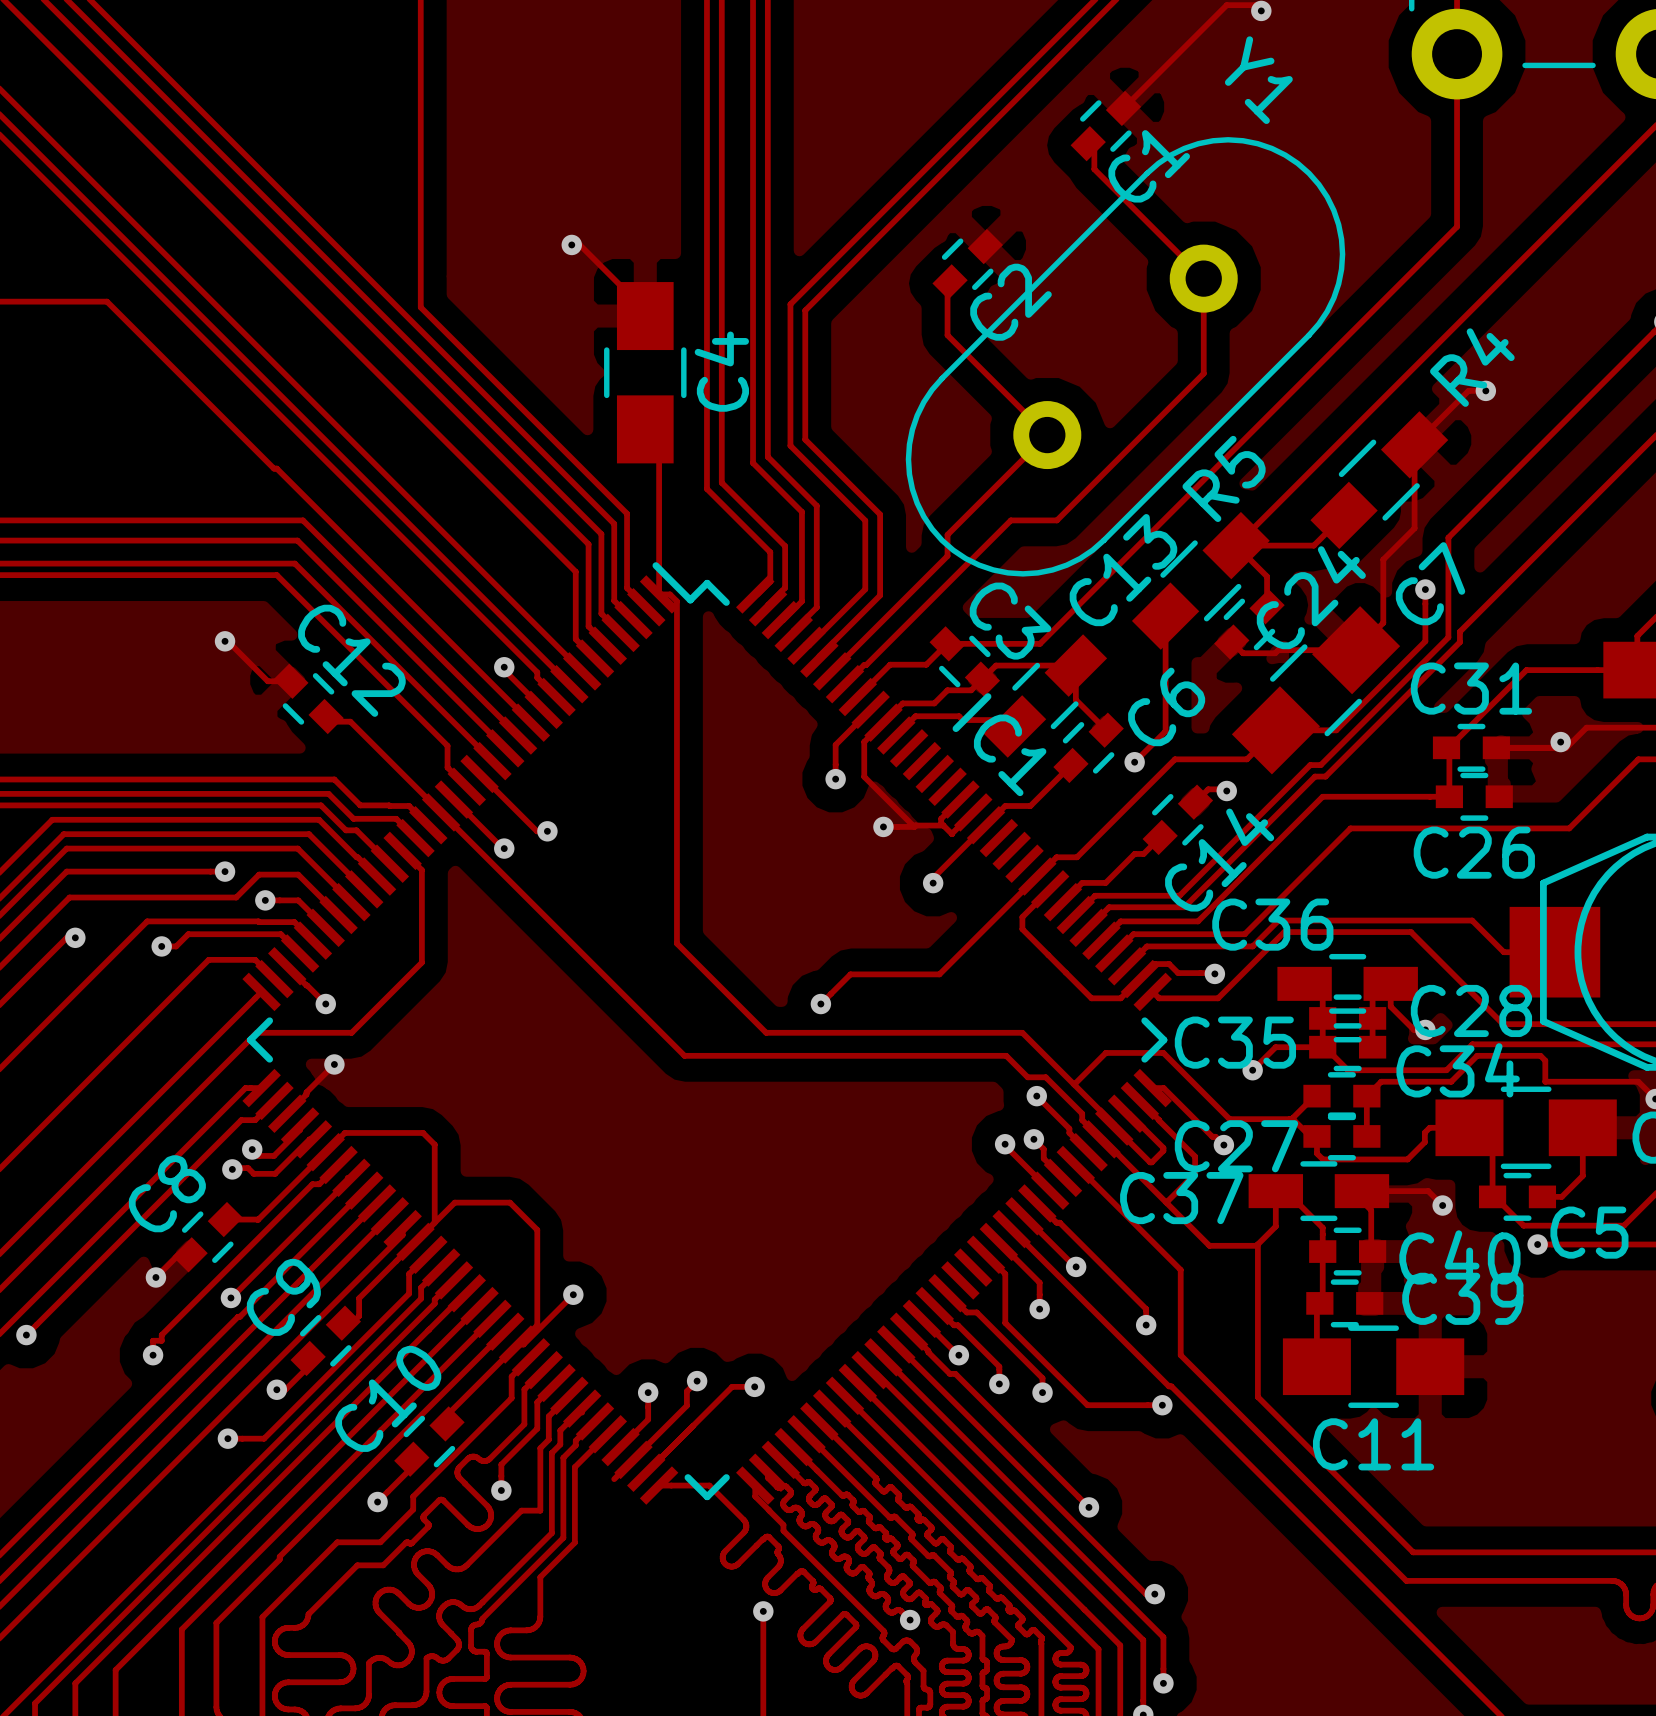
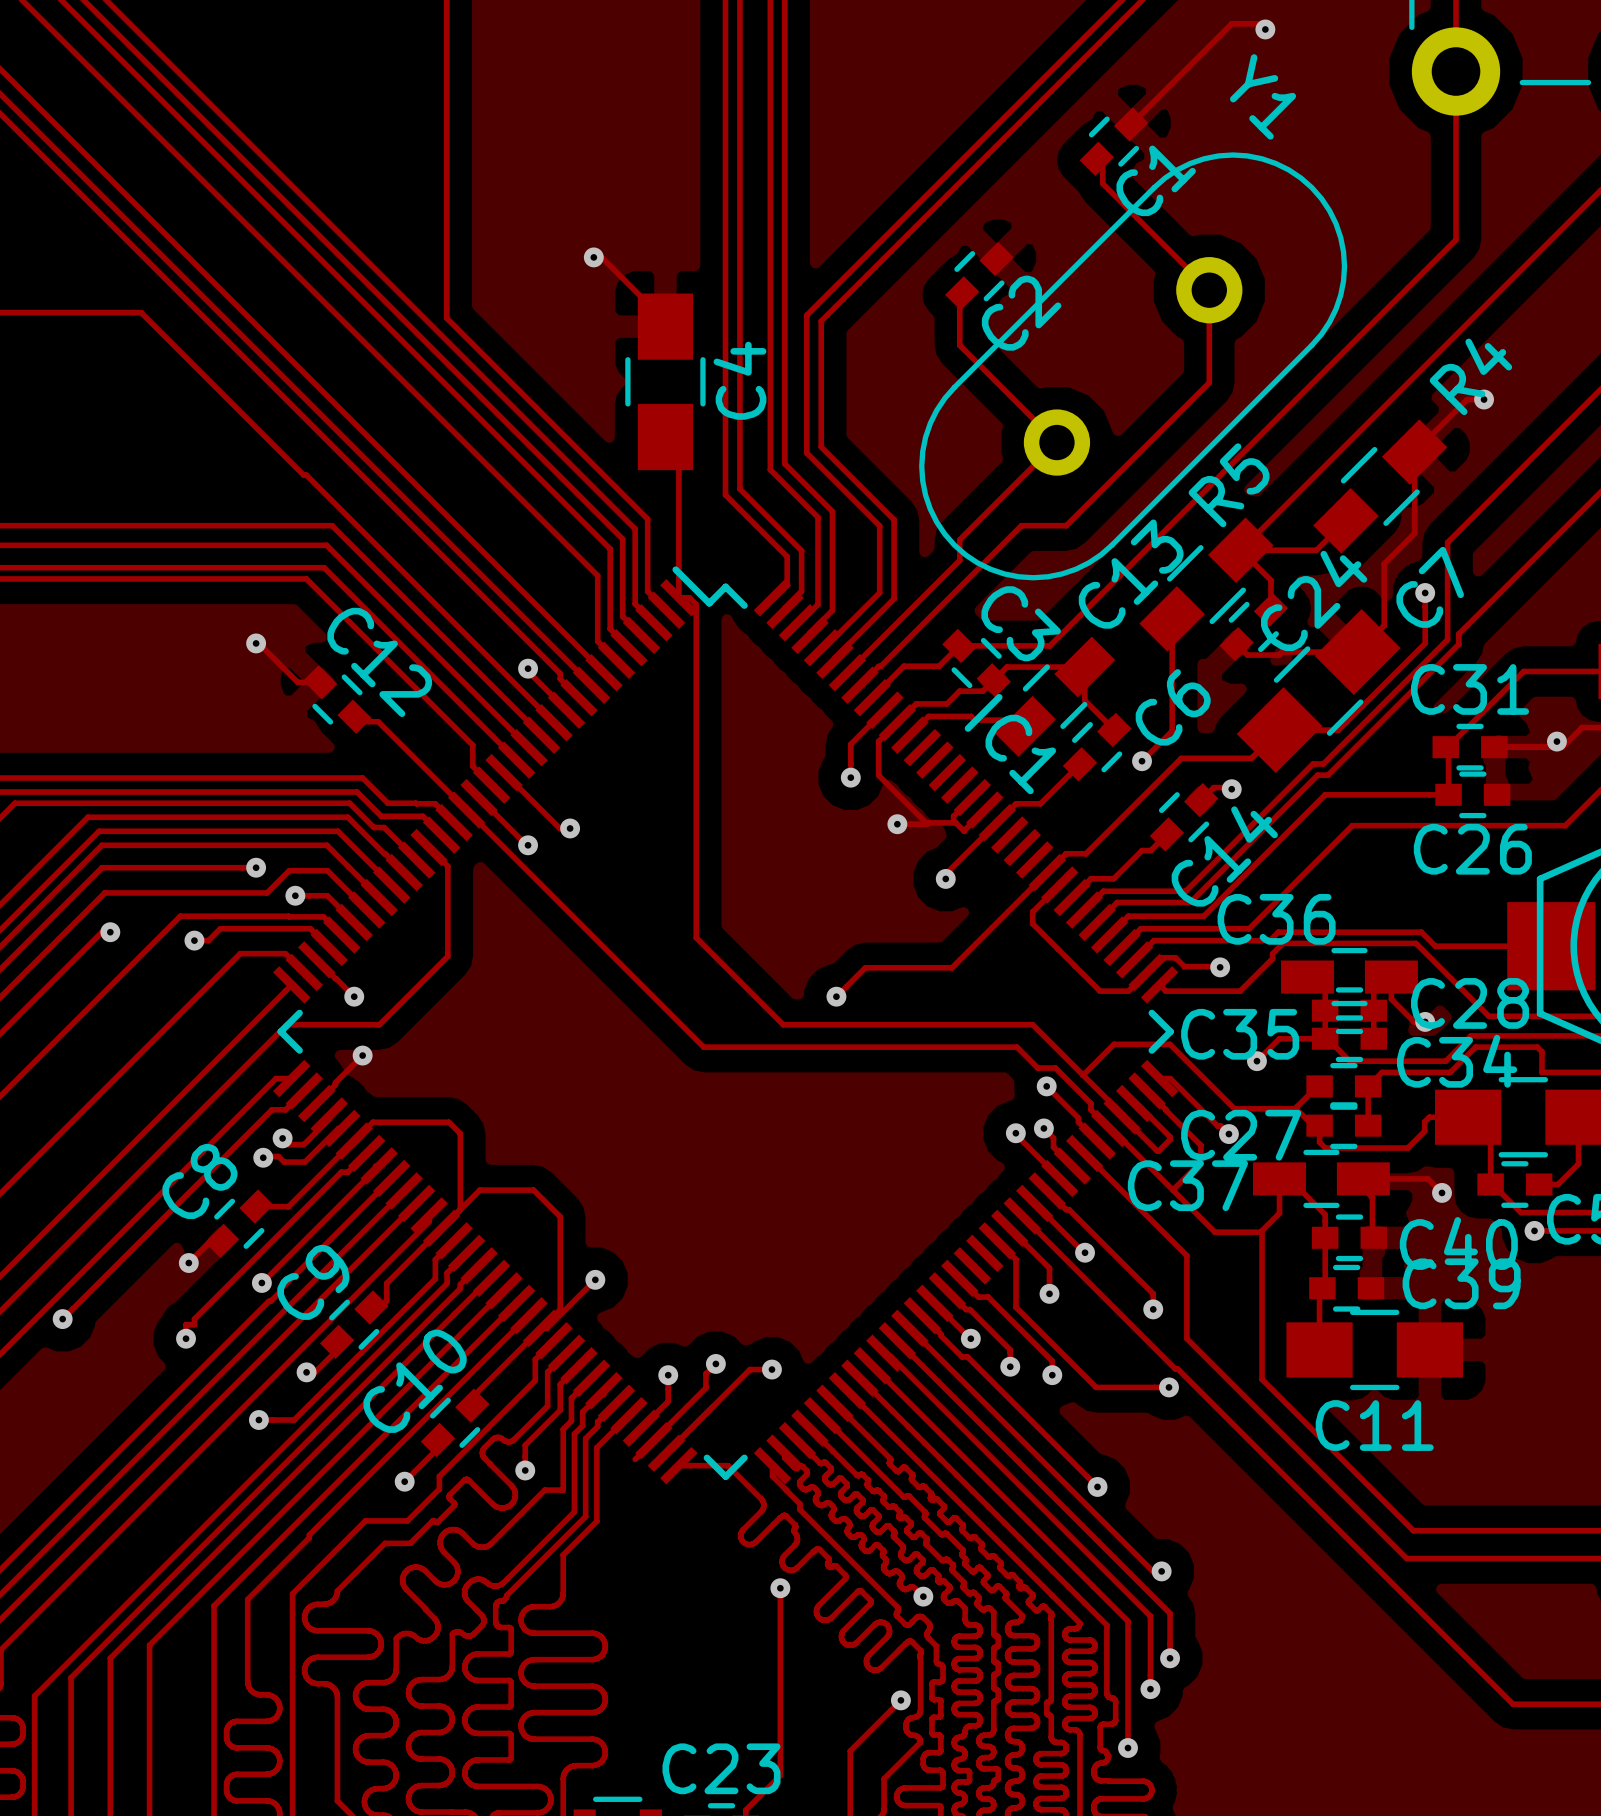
track: (1252, 946) (1278, 920) (1472, 920) (1503, 952) -> (1256, 940) (1269, 940) (1278, 932) (1421, 932) (1435, 946) (1501, 946)
track: (1218, 998) (1284, 932) (1410, 932) (1503, 1024) -> (1223, 991) (1240, 991) (1272, 958) (1272, 953) (1283, 943) (1415, 943) (1488, 1016) (1500, 1016)

